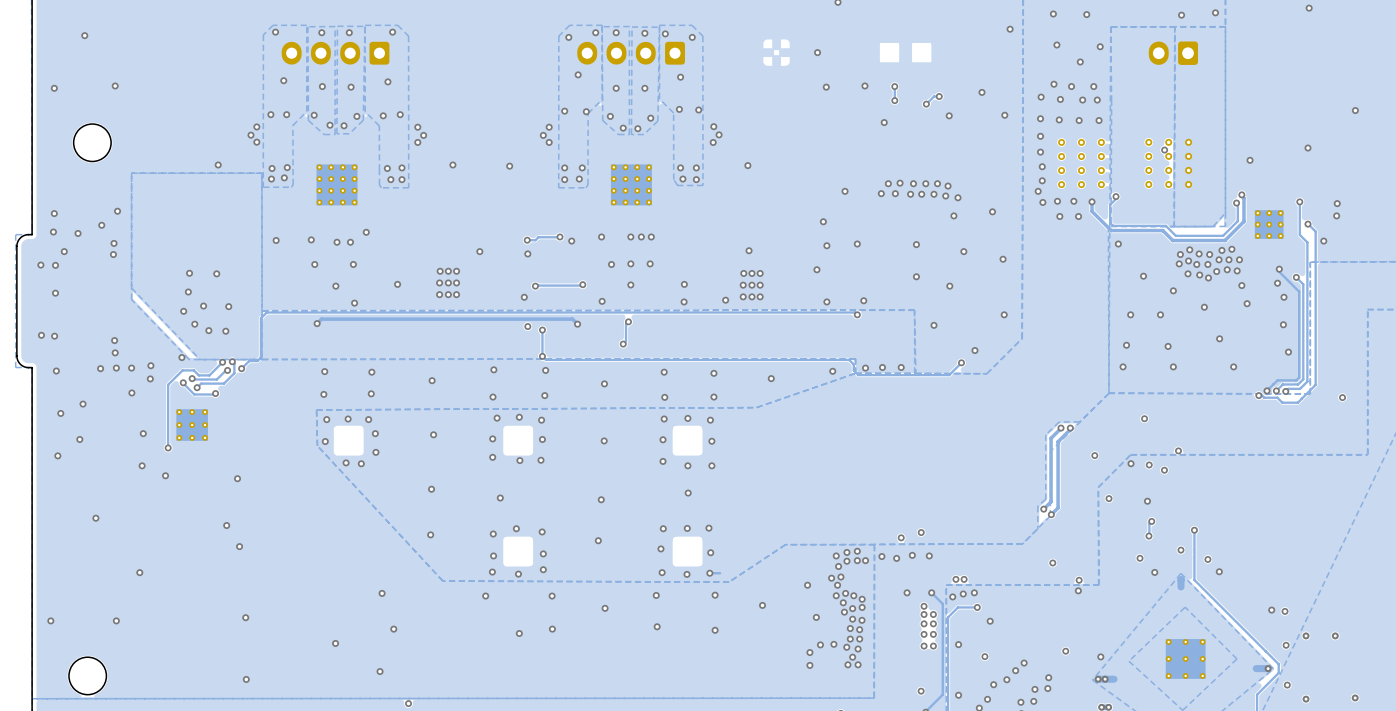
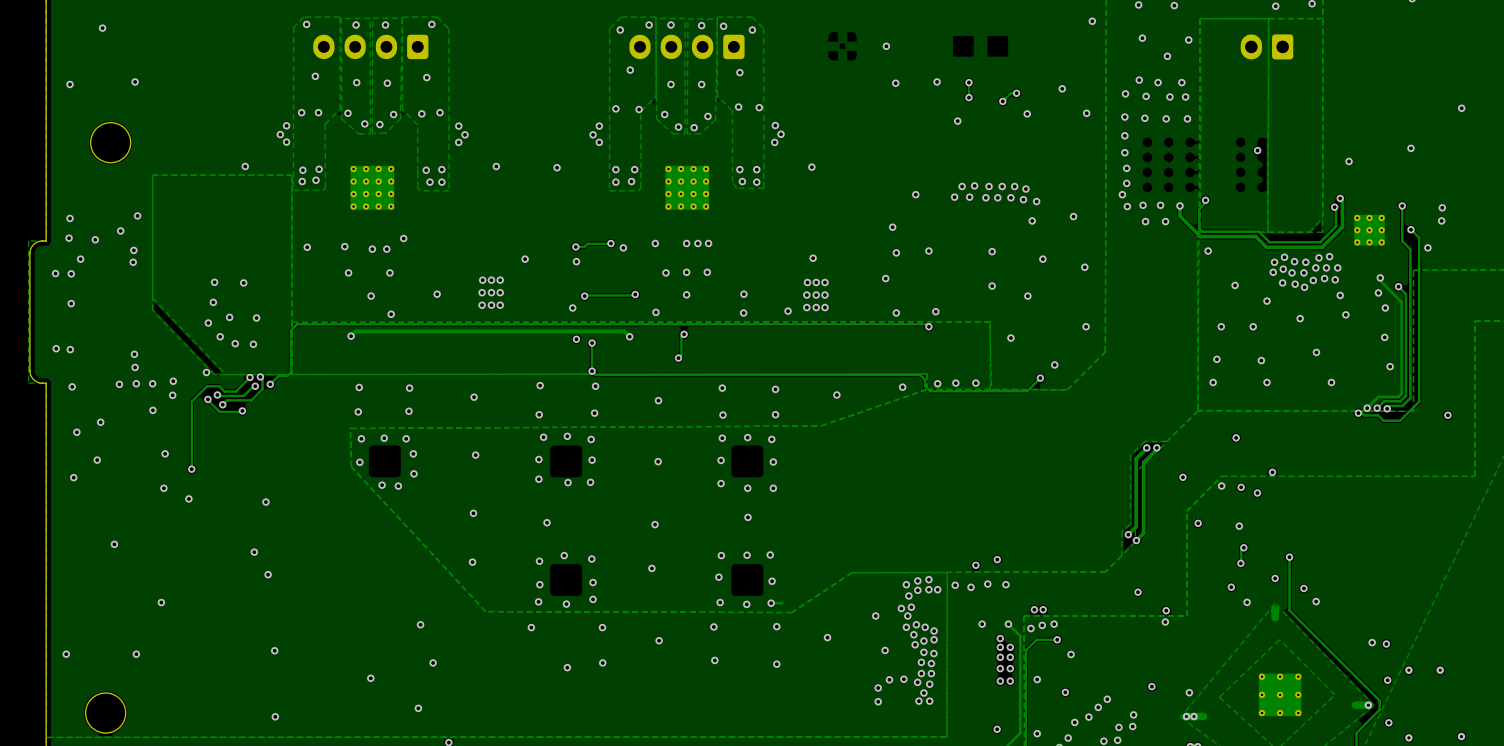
part: (1081, 163) -> none
part: (1168, 163) -> none
part: (192, 425) -> none

